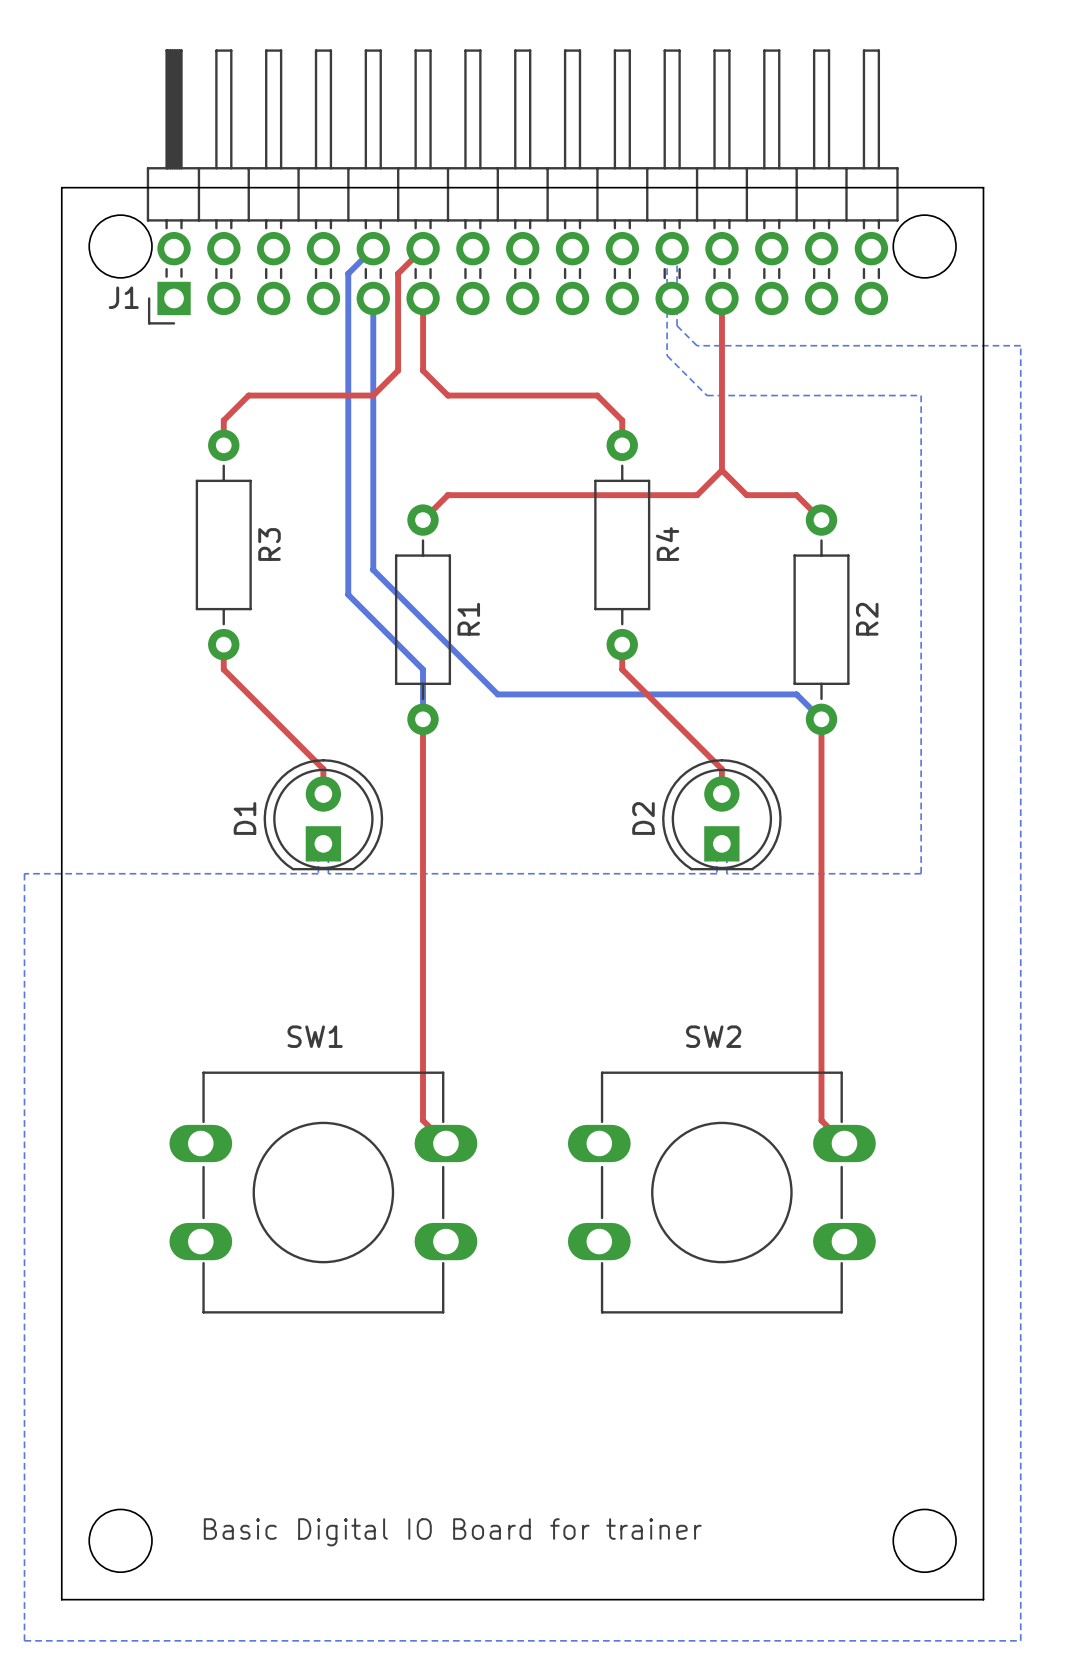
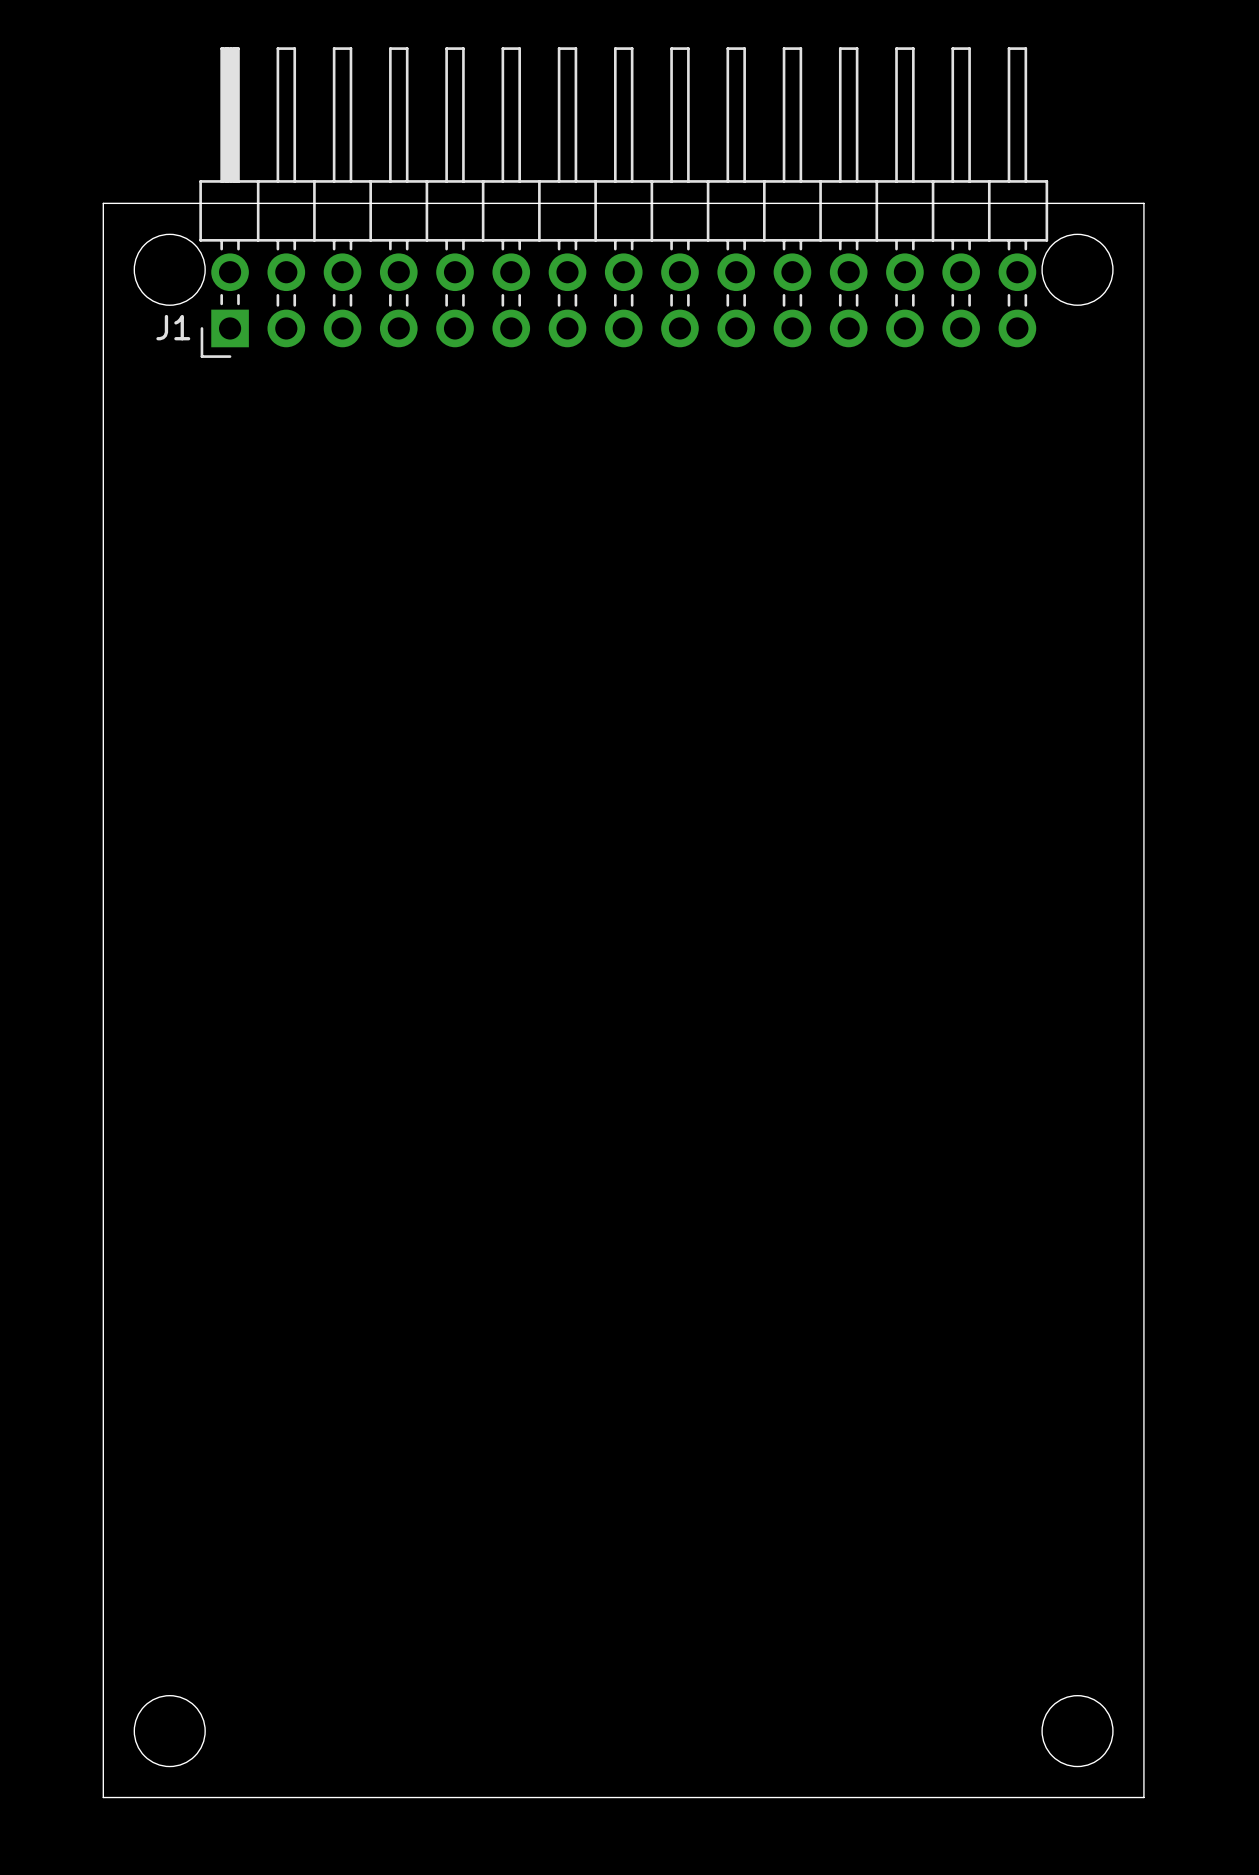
bottom zone outline: (667, 236) (677, 236) (677, 325) (696, 345) (1020, 345) (1020, 1640) (24, 1640) (24, 873) (318, 873) (318, 833) (328, 833) (328, 873) (716, 873) (716, 833) (726, 833) (726, 873) (921, 873) (921, 395) (706, 395) (667, 355) (667, 236) -> none
bottom track: (373, 248) (348, 273) (348, 594) (423, 669) (423, 719) -> none
top track: (423, 248) (398, 273) (398, 370) (373, 395) (248, 395) (223, 420) (223, 445) -> none
bottom track: (373, 298) (373, 569) -> none
top track: (423, 298) (423, 370) -> none
top track: (721, 298) (721, 470) -> none
top track: (423, 370) (447, 395) (597, 395) (622, 420) (622, 445) -> none
top track: (721, 470) (697, 495) (447, 495) (423, 520) -> none
top track: (721, 470) (746, 495) (796, 495) (821, 520) -> none
R3: (223, 544) -> none
R4: (622, 544) -> none
bottom track: (373, 569) (497, 694) (796, 694) (821, 719) -> none
R1: (423, 619) -> none
R2: (821, 619) -> none
top track: (223, 644) (223, 669) (323, 769) (323, 794) -> none
top track: (622, 644) (622, 669) (721, 769) (721, 794) -> none
top track: (423, 719) (423, 1120) (445, 1143) -> none
top track: (821, 719) (821, 1120) (844, 1143) -> none
D1: (323, 814) -> none
D2: (721, 814) -> none
SW1: (323, 1192) -> none
SW2: (721, 1192) -> none
text: Basic Digital IO Board for trainer (452, 1532) -> none

